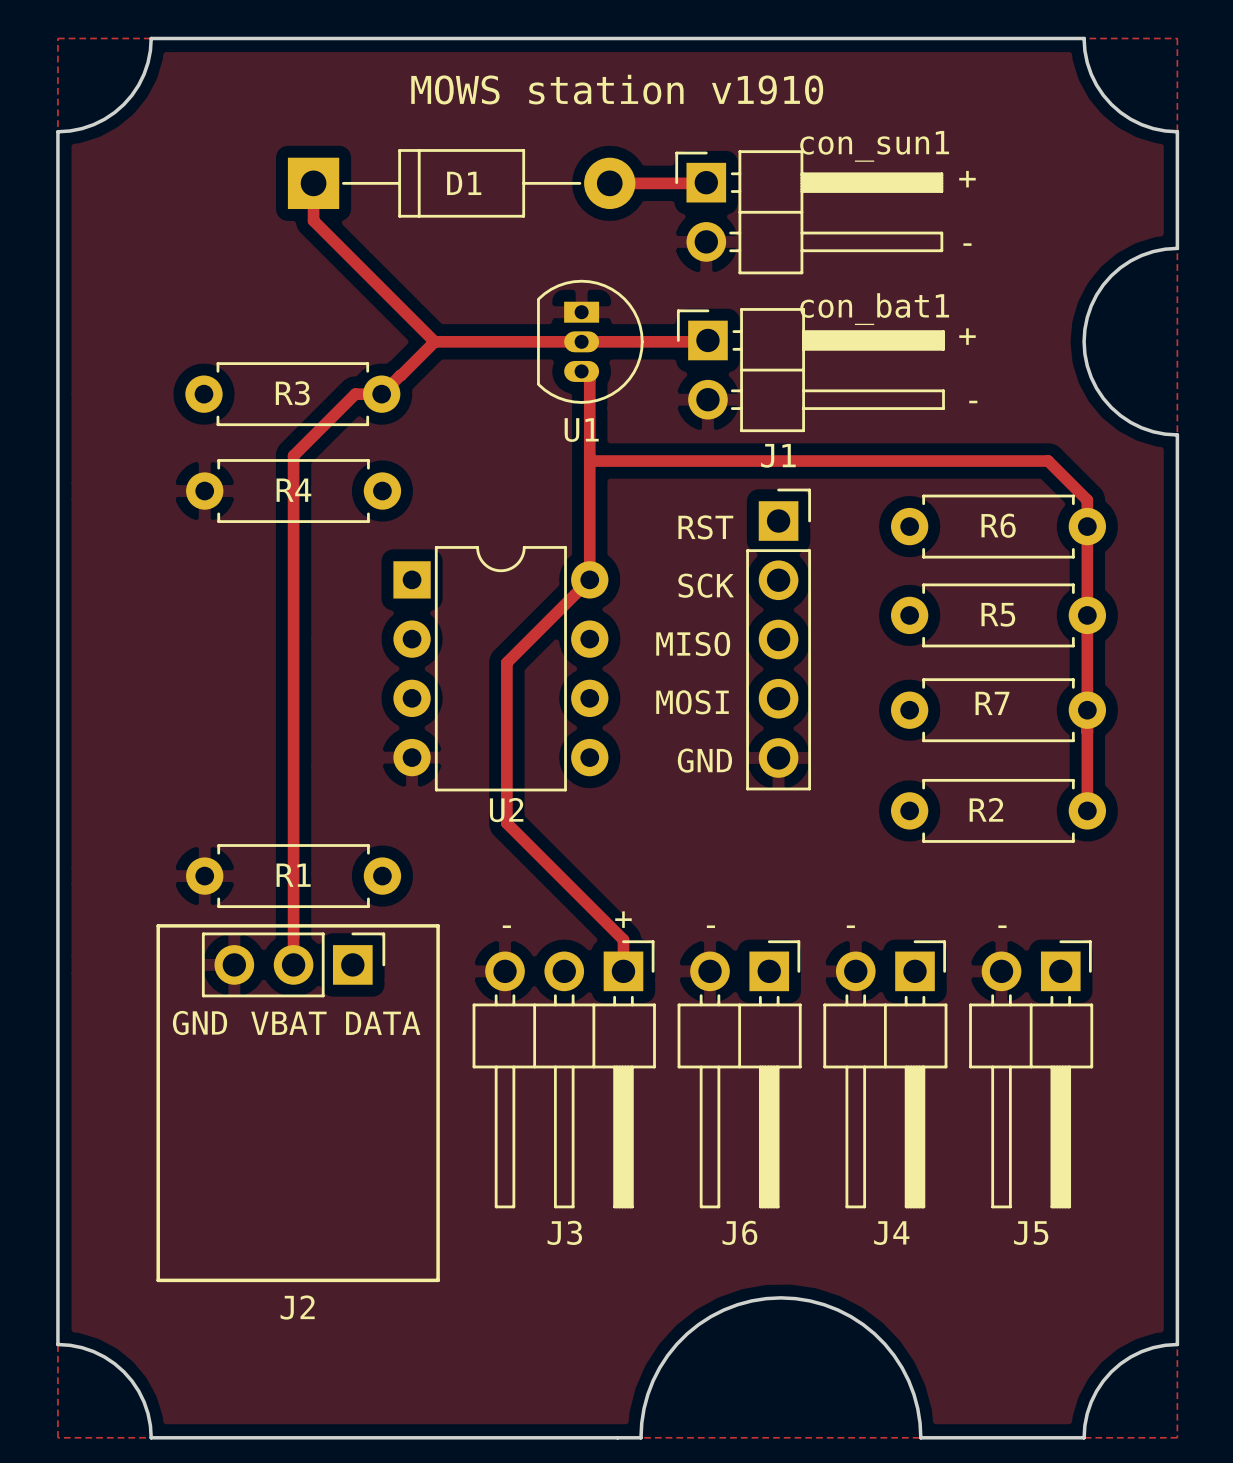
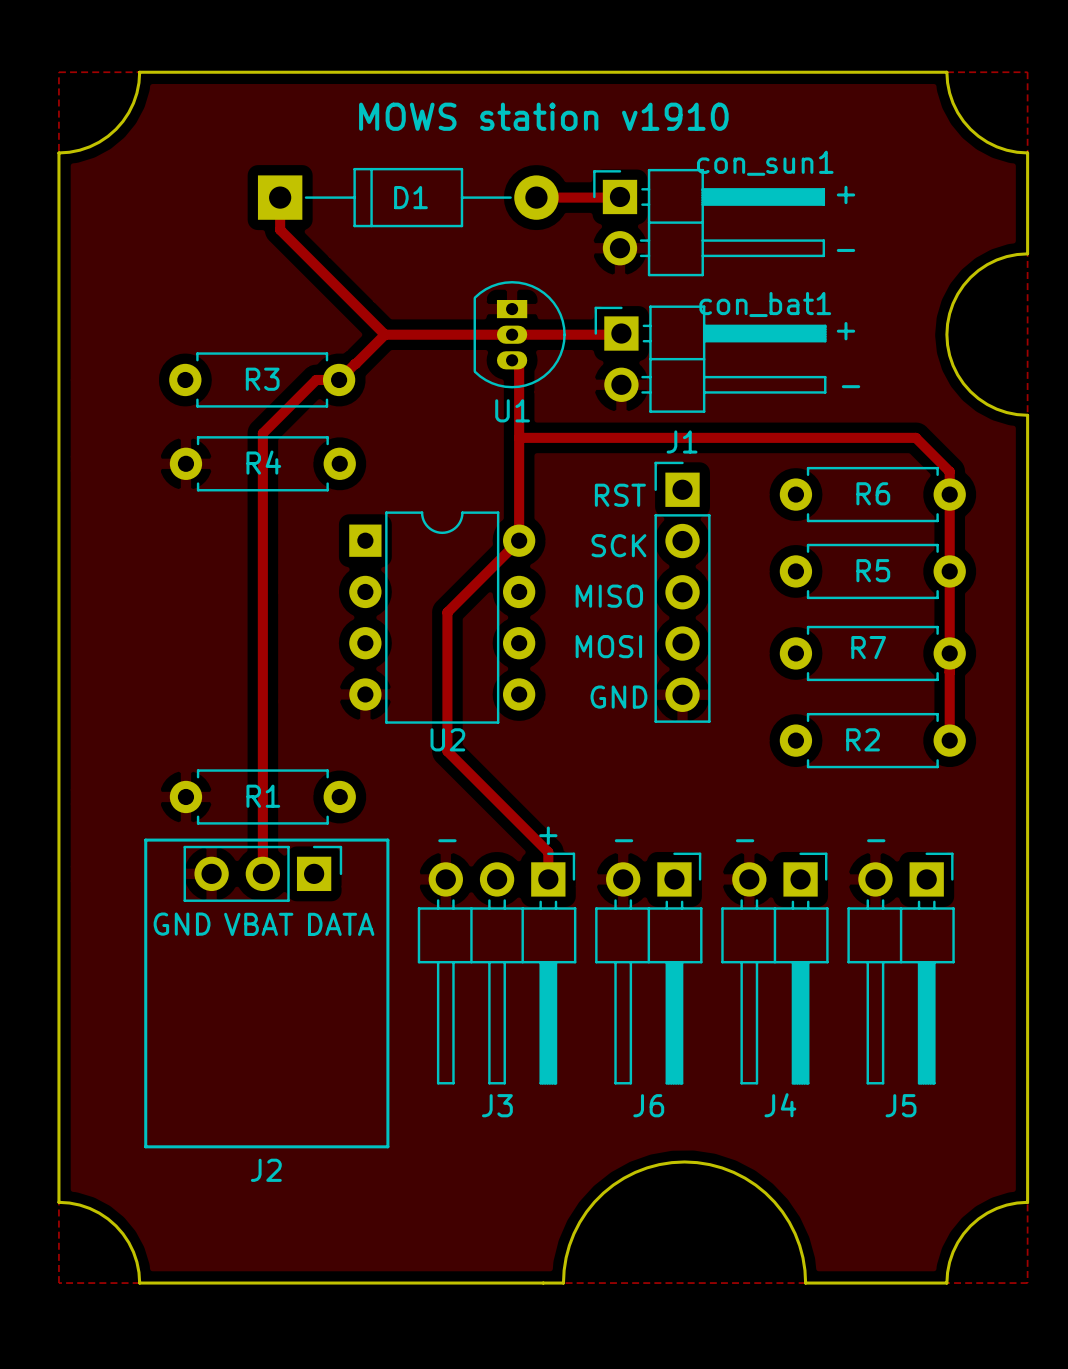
J1 footprint: [746, 488, 811, 791] -> [654, 461, 711, 723]

